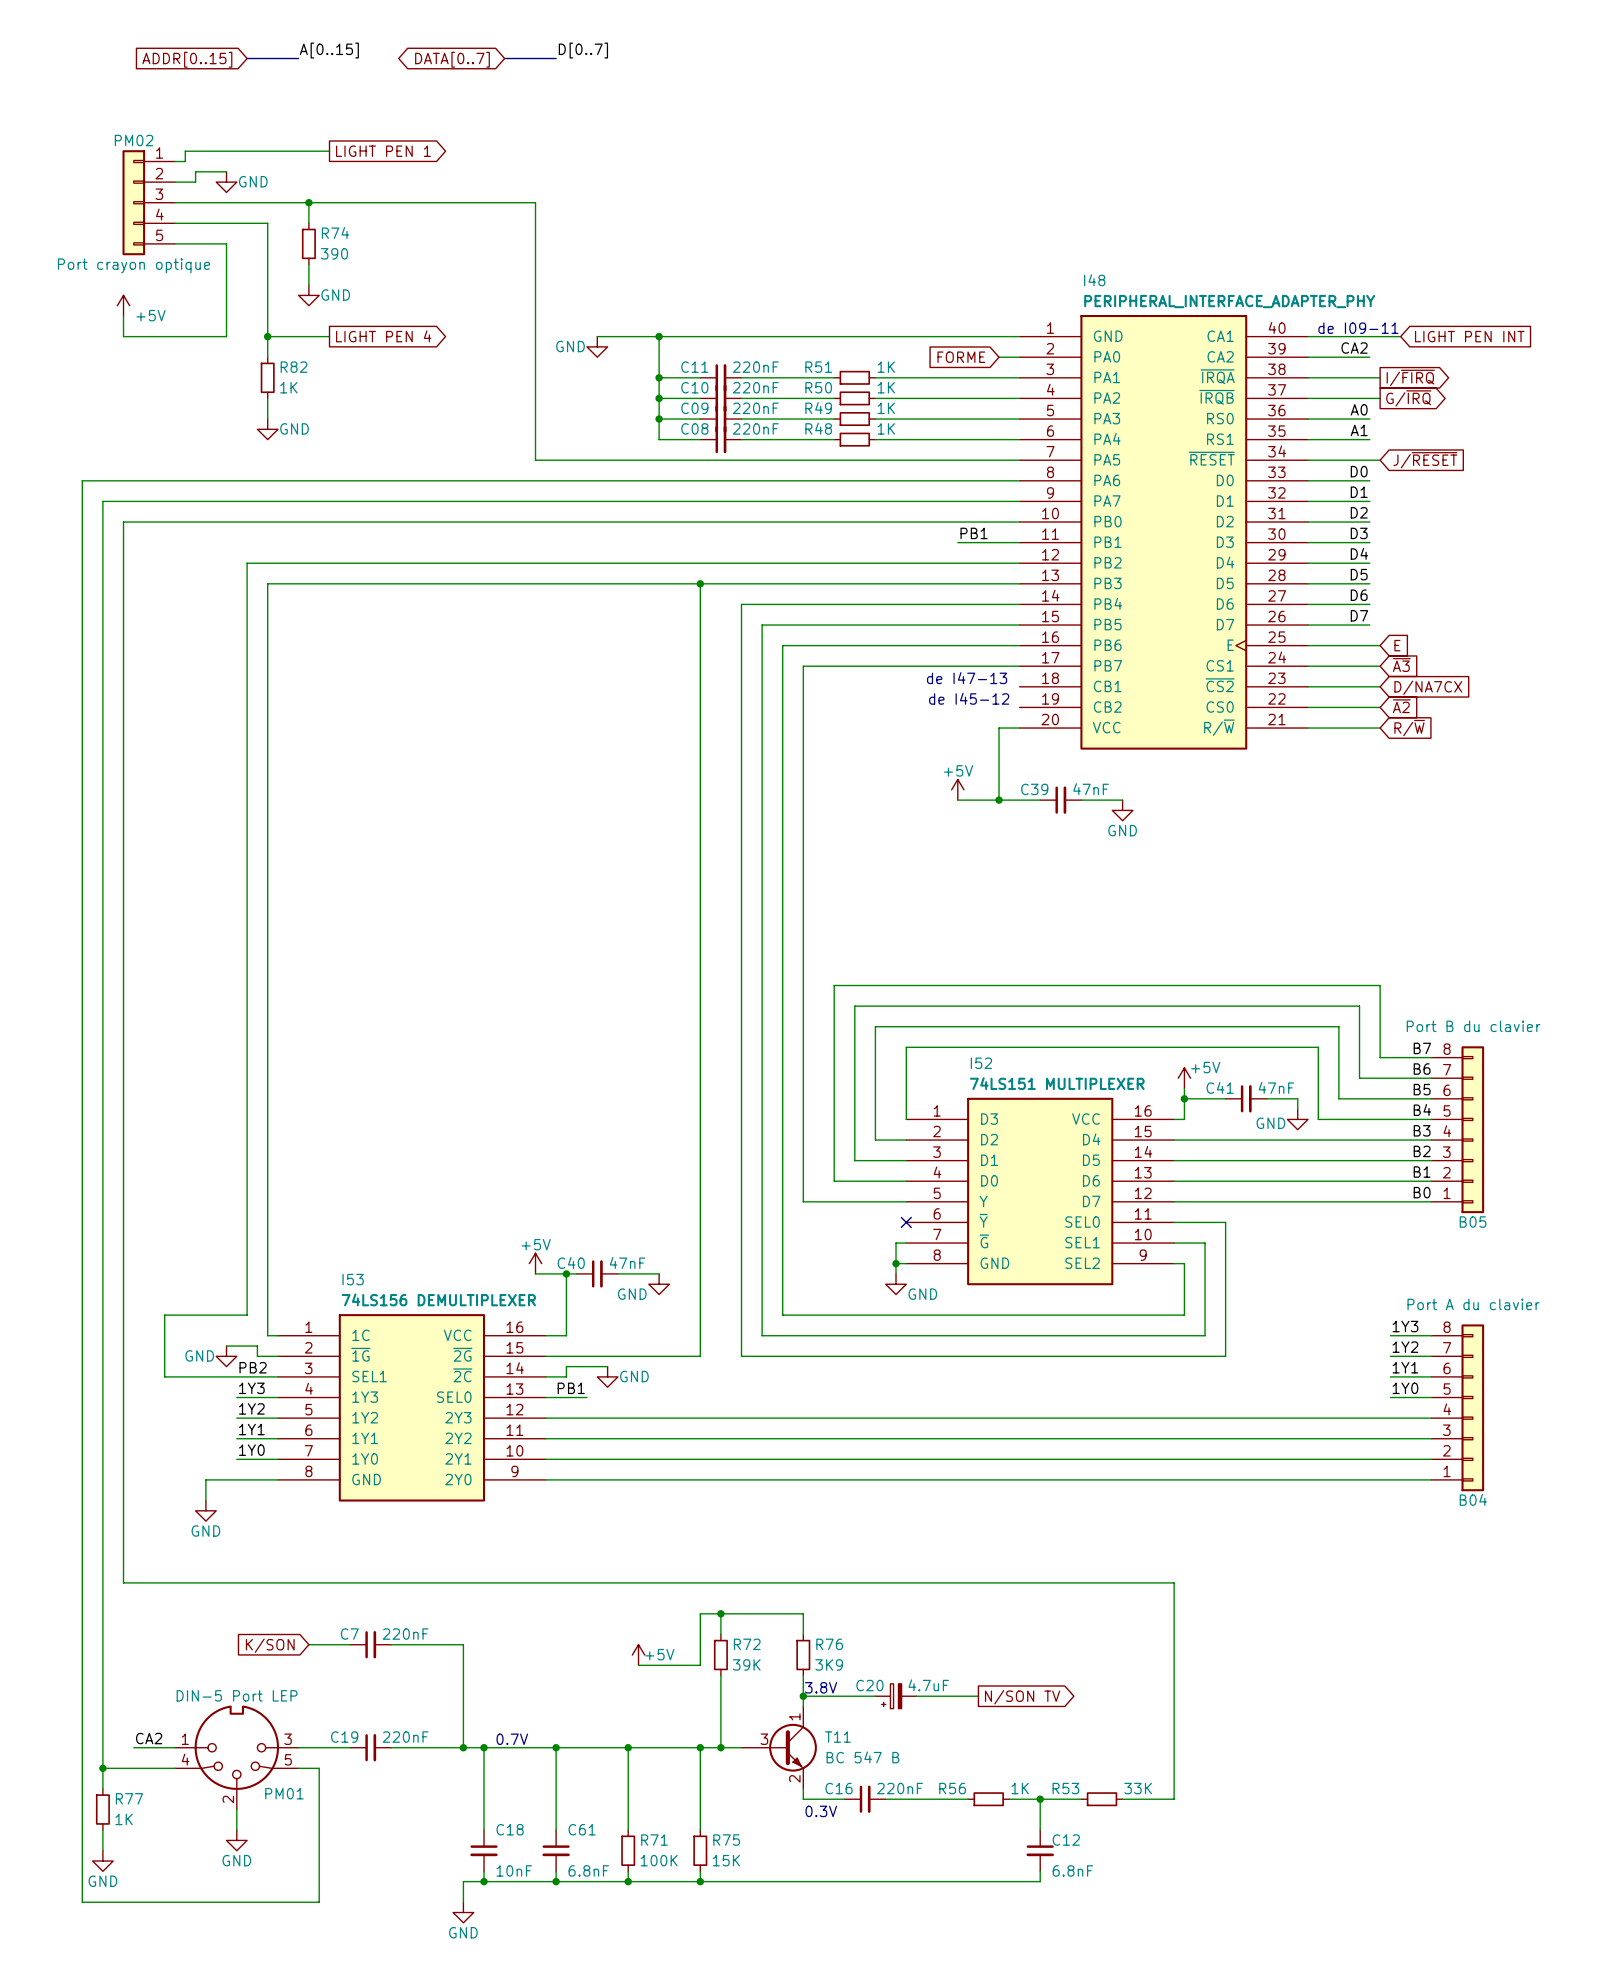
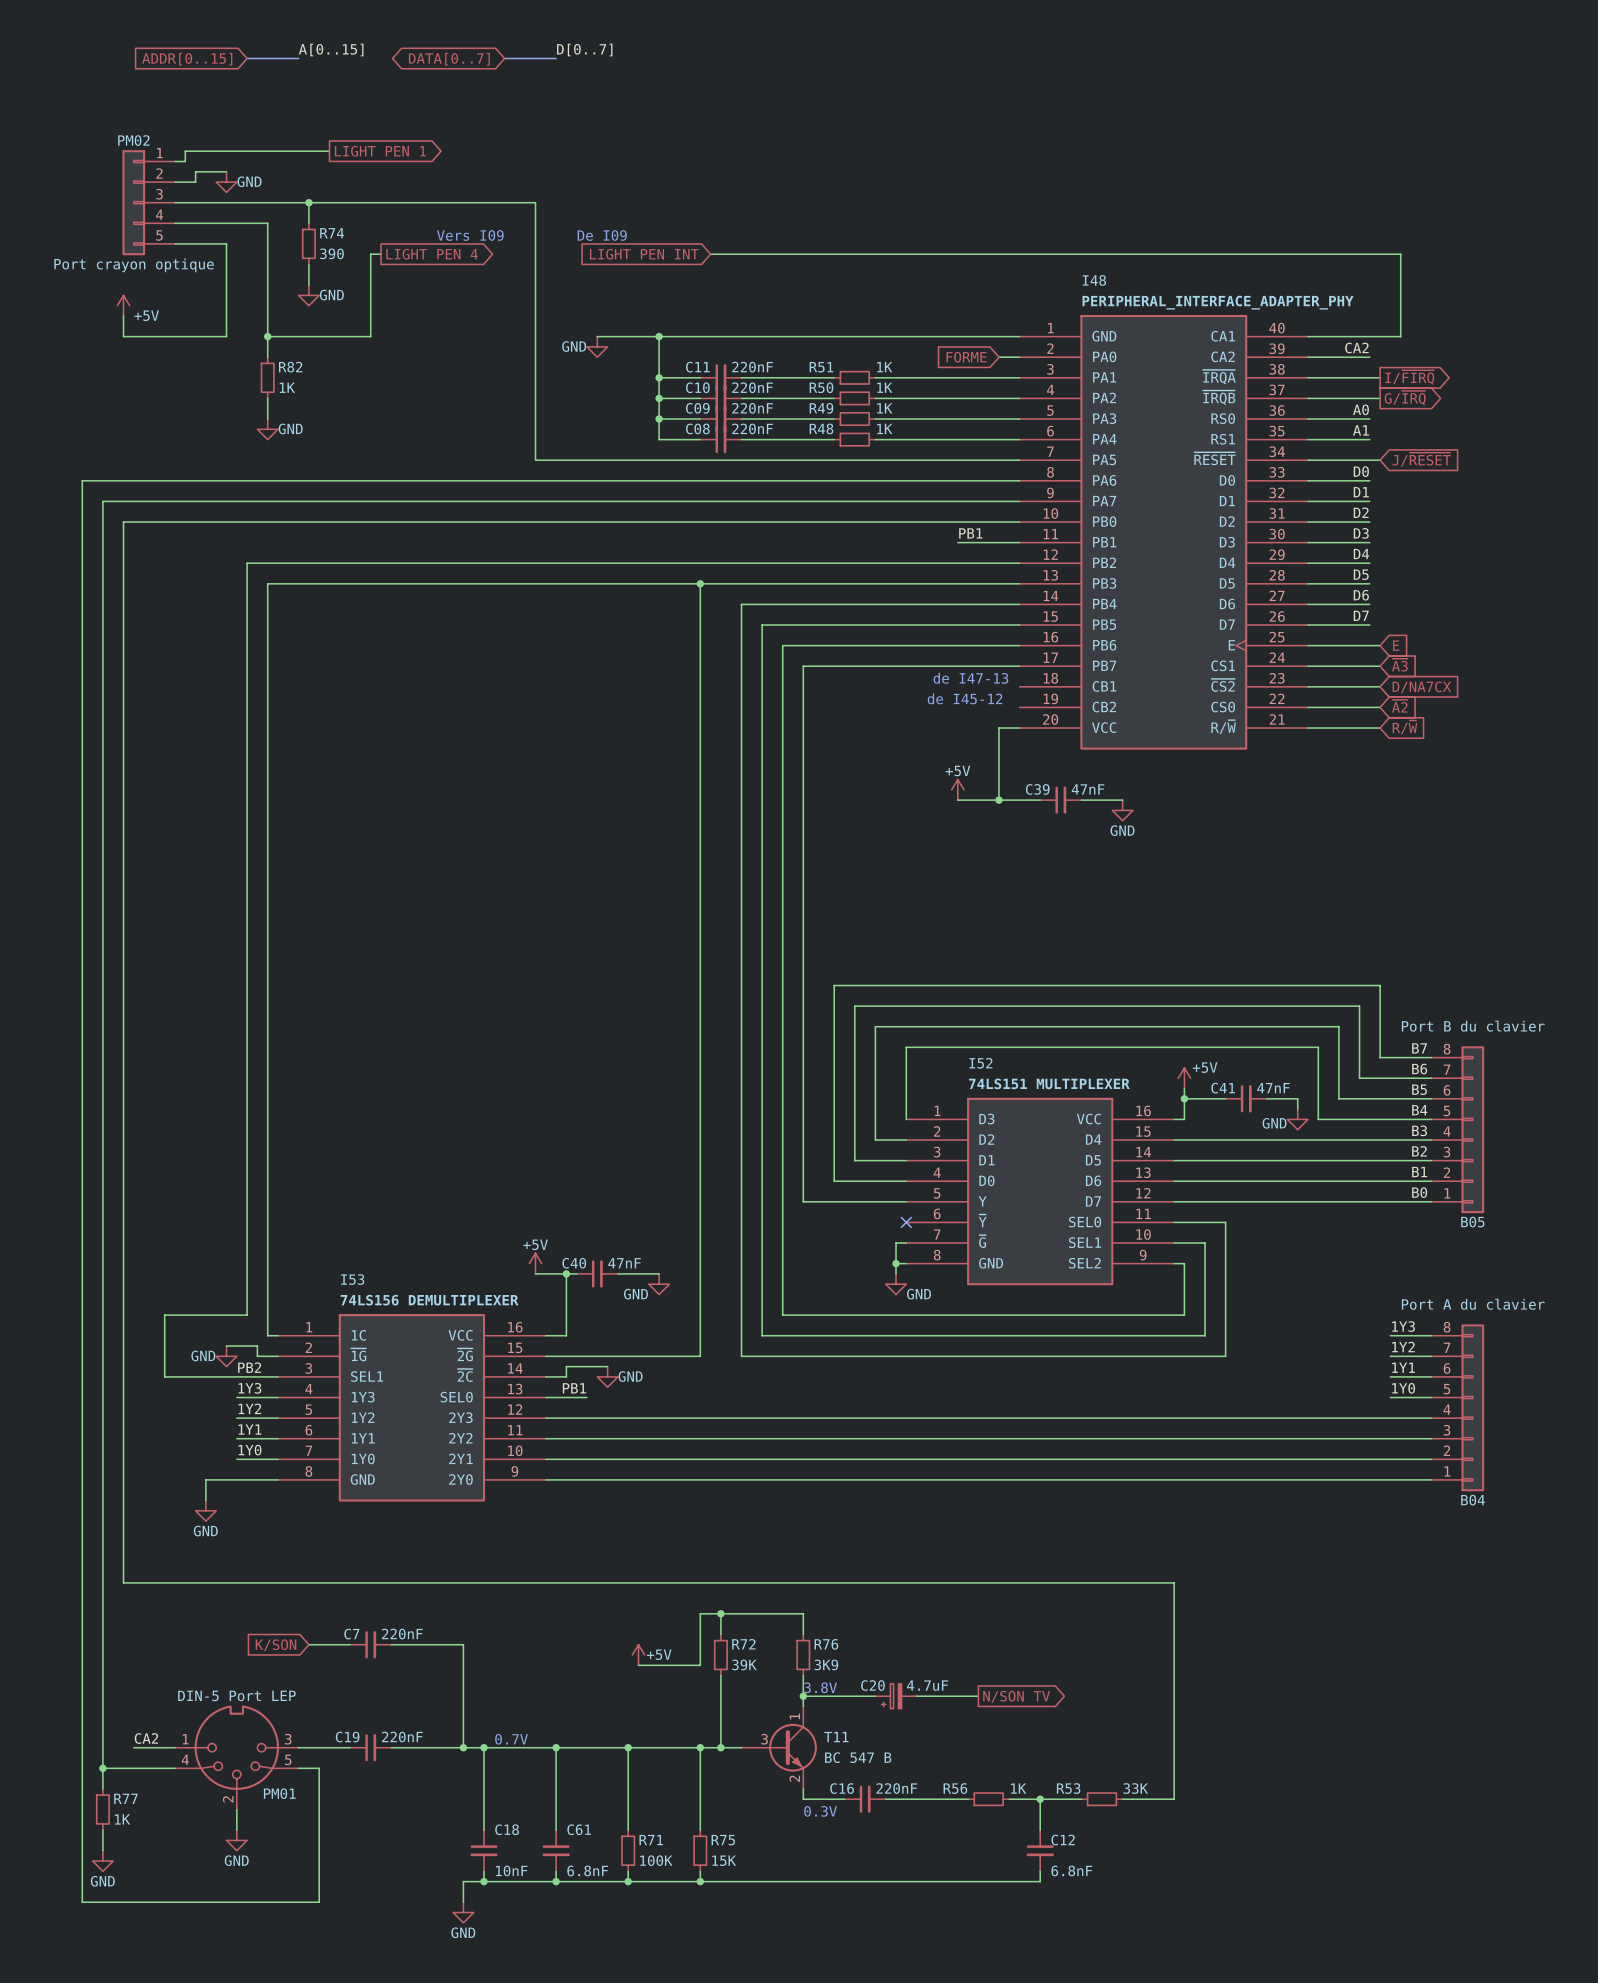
text: none -> Vers I09 (470, 235)
text: none -> De I09 (602, 235)
wire: none -> (381, 254) (370, 254) (370, 336) (329, 336)
global label: none -> LIGHT PEN INT (644, 254)
wire: none -> (710, 254) (1400, 254) (1400, 336)
text: de I09-11 (1358, 328) -> none
global label position: LIGHT PEN 4 (383, 336) -> LIGHT PEN 4 (432, 254)
global label: LIGHT PEN INT (1469, 336) -> none

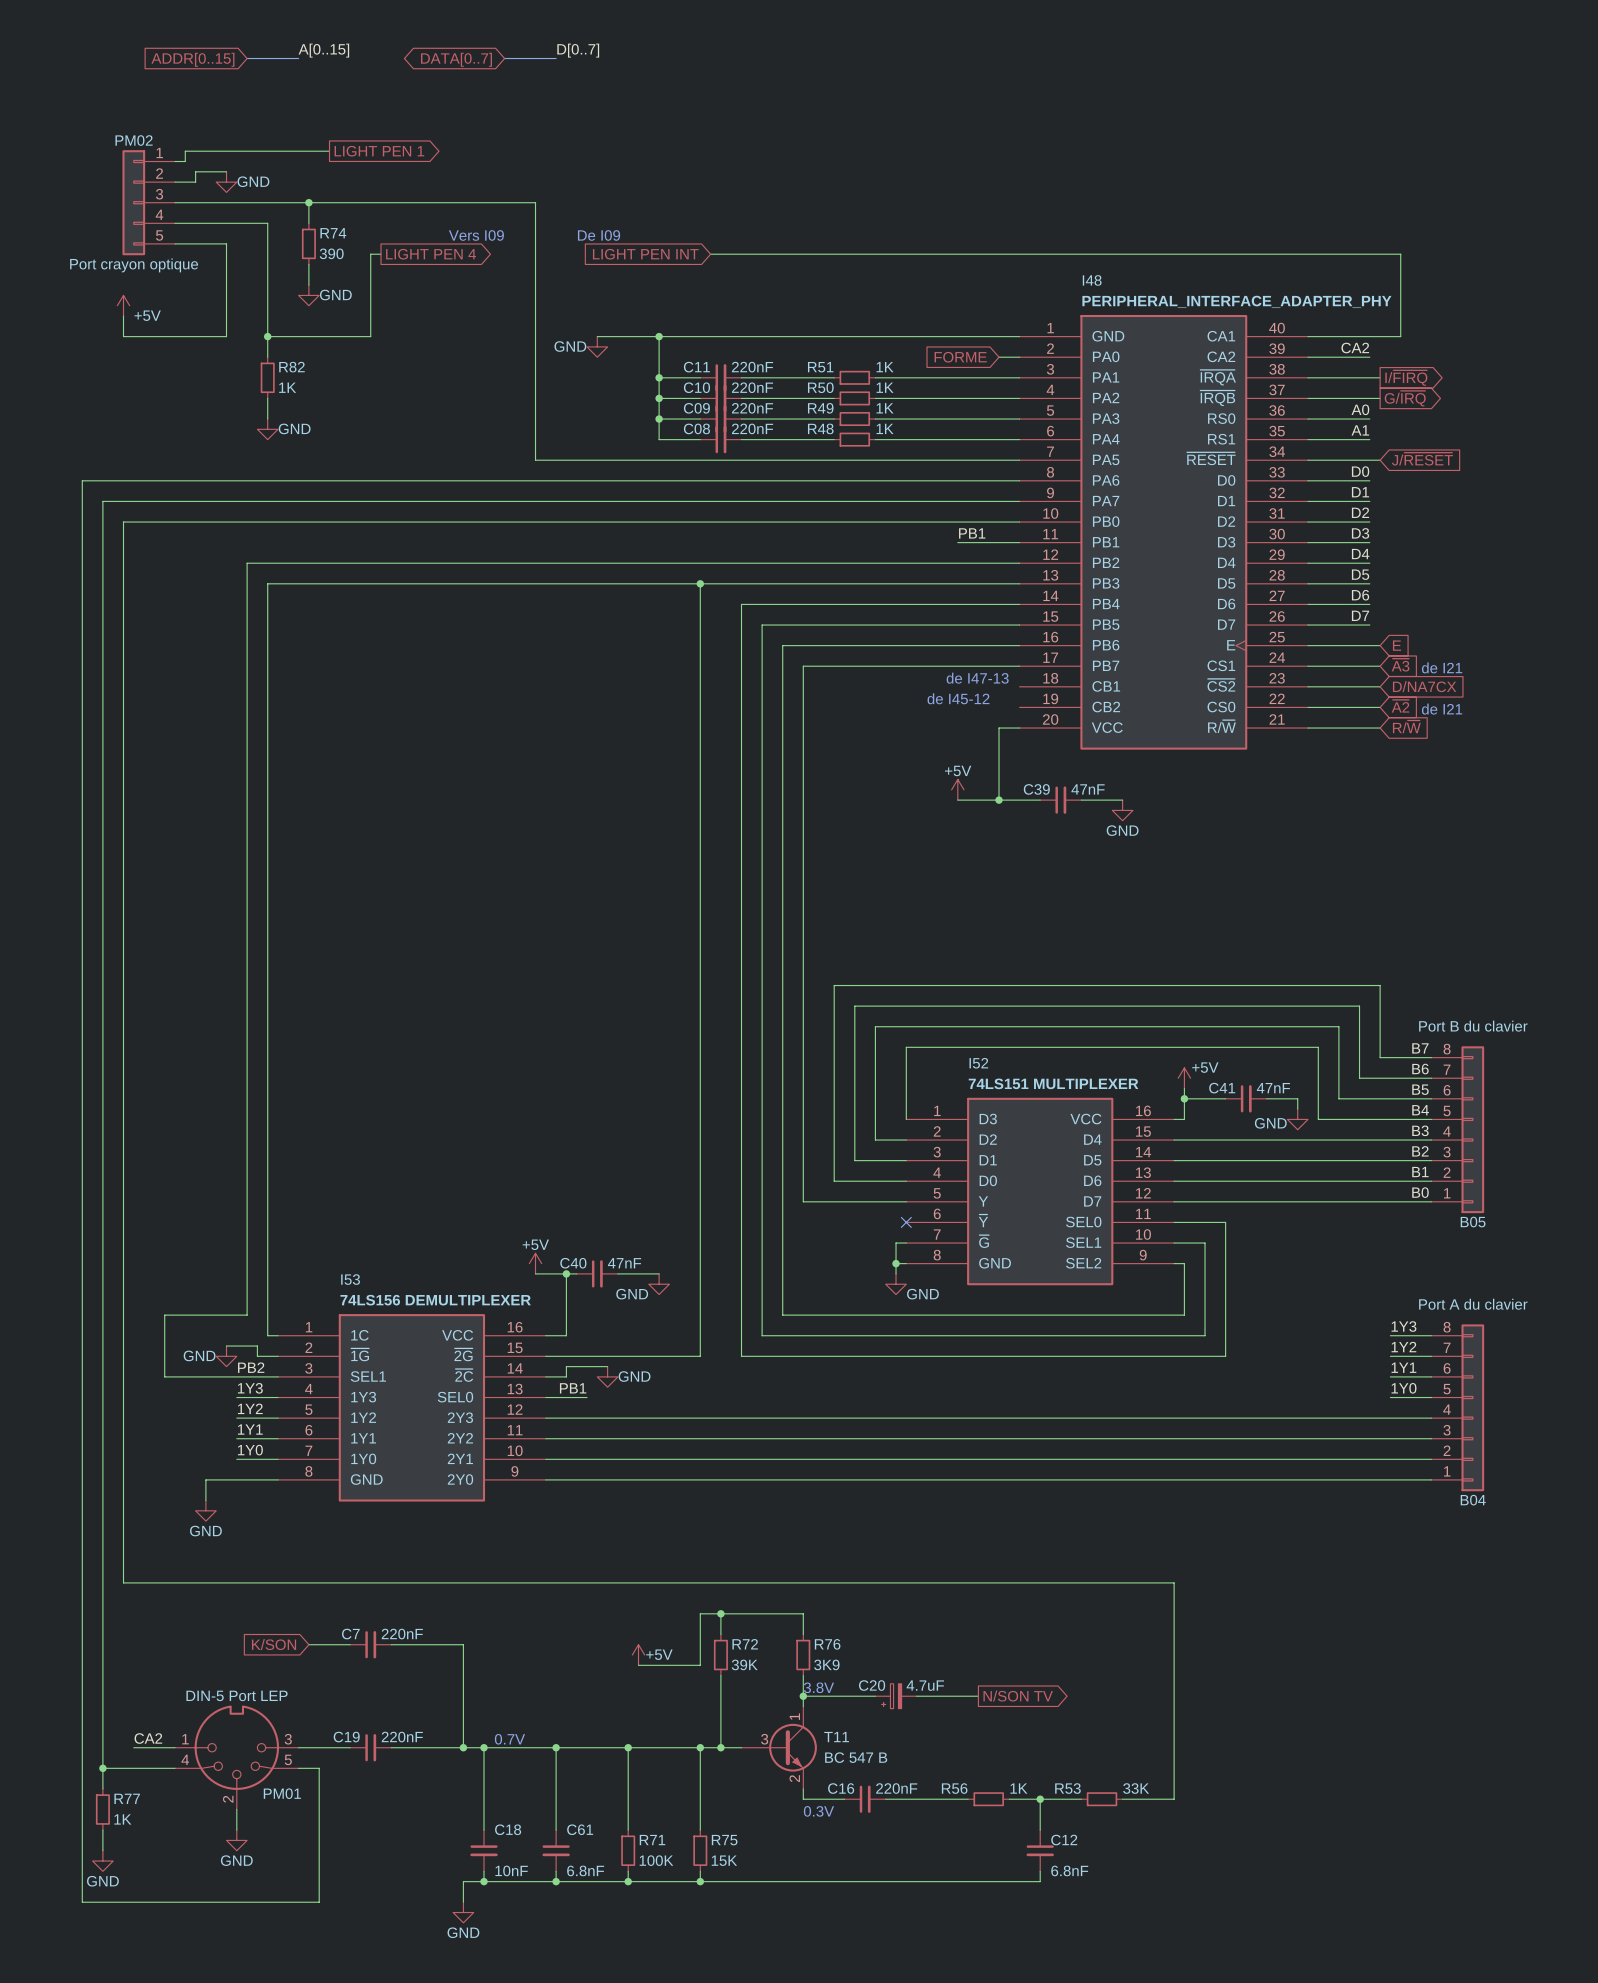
text: none -> de I21 (1442, 667)
text: none -> de I21 (1442, 709)

